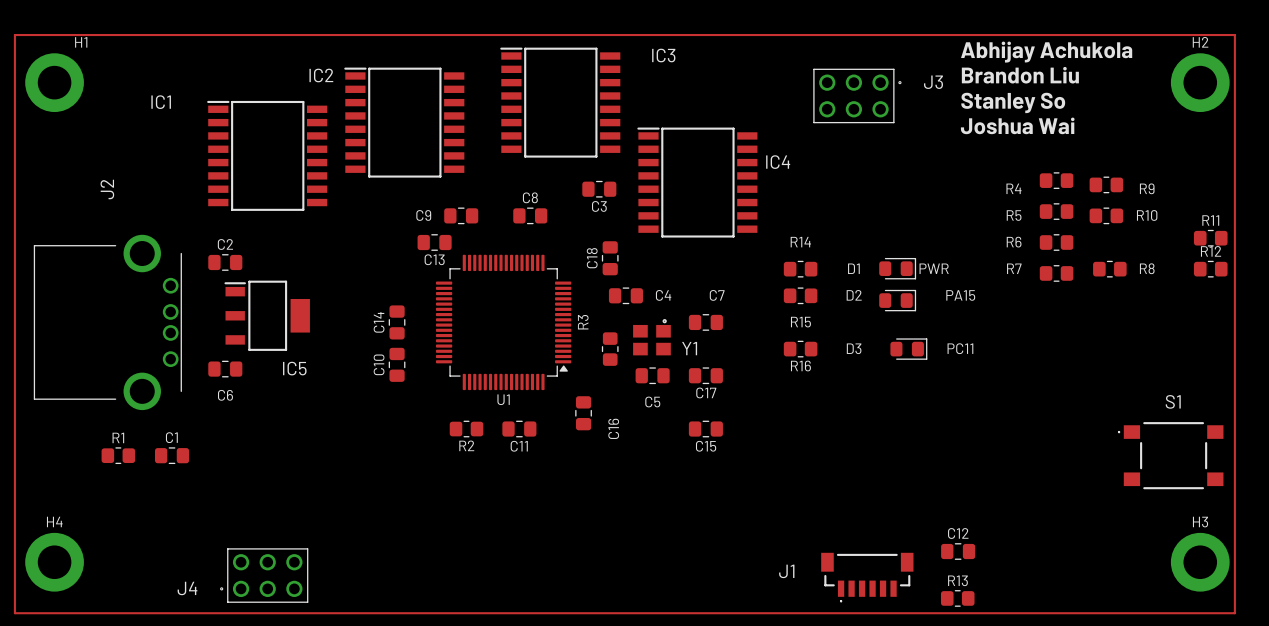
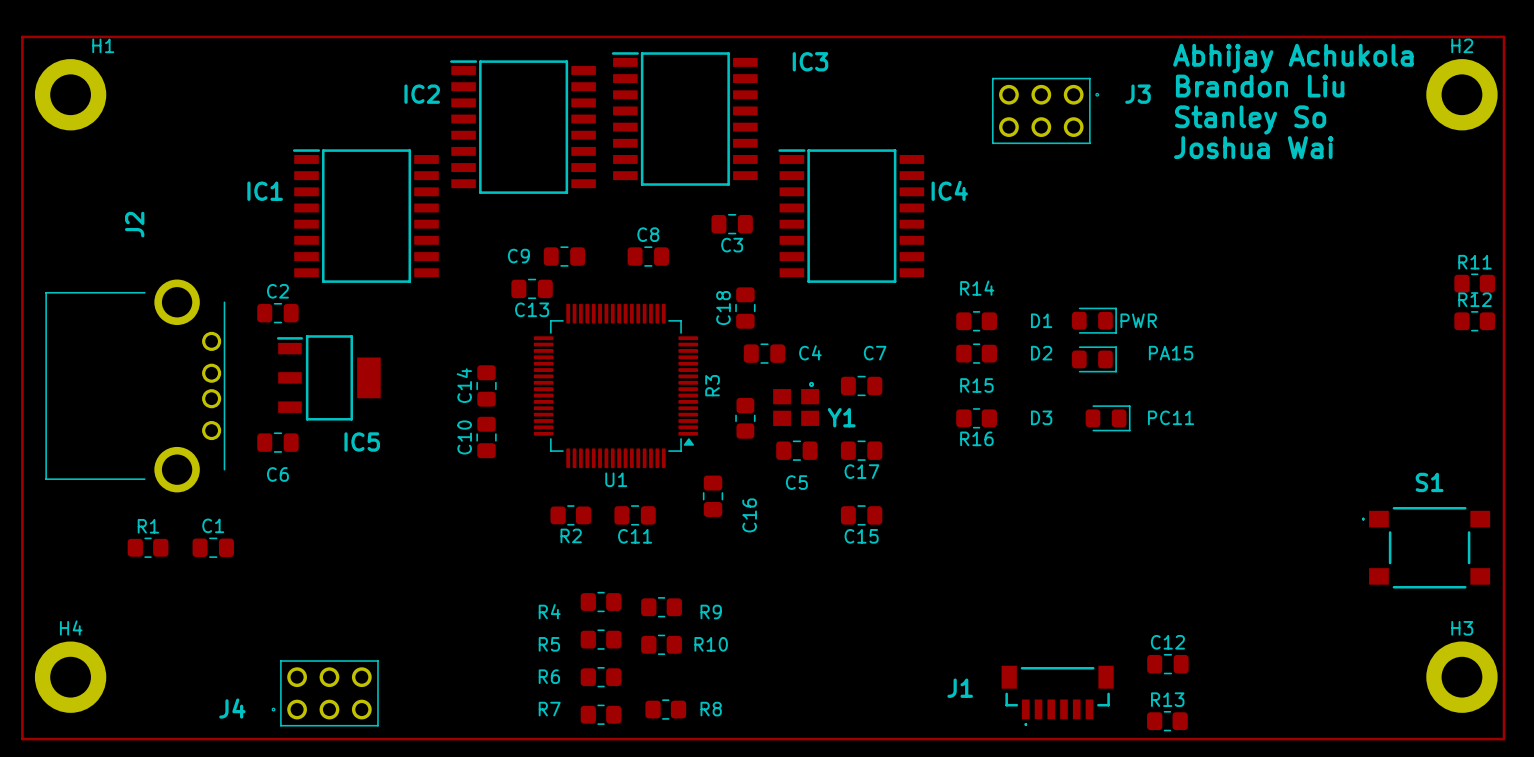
IC2 name position: IC2 (321, 75) -> IC2 (422, 94)
IC1 name position: IC1 (161, 102) -> IC1 (265, 191)
IC2 position: (404, 122) -> (522, 127)
IC1 position: (267, 155) -> (365, 216)
R4 position: (1056, 180) -> (601, 602)
R9 position: (1106, 184) -> (661, 607)
R5 position: (1056, 211) -> (601, 639)
R10 position: (1106, 215) -> (661, 644)
R6 position: (1056, 242) -> (601, 677)
R8 position: (1109, 269) -> (665, 709)
R7 position: (1056, 273) -> (601, 714)

